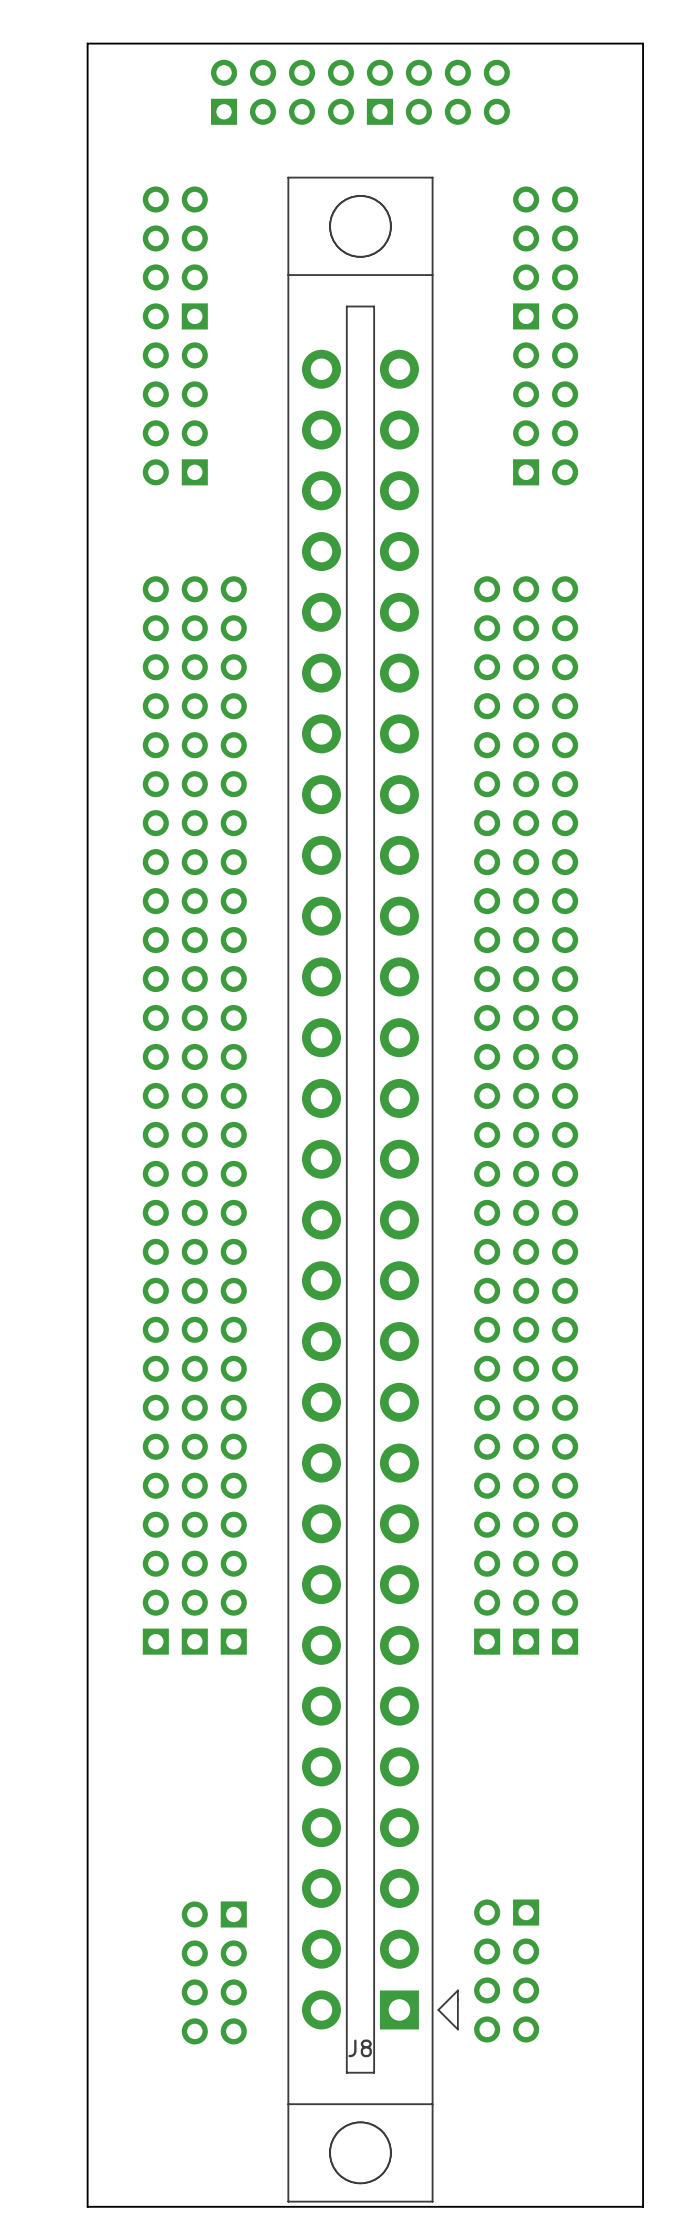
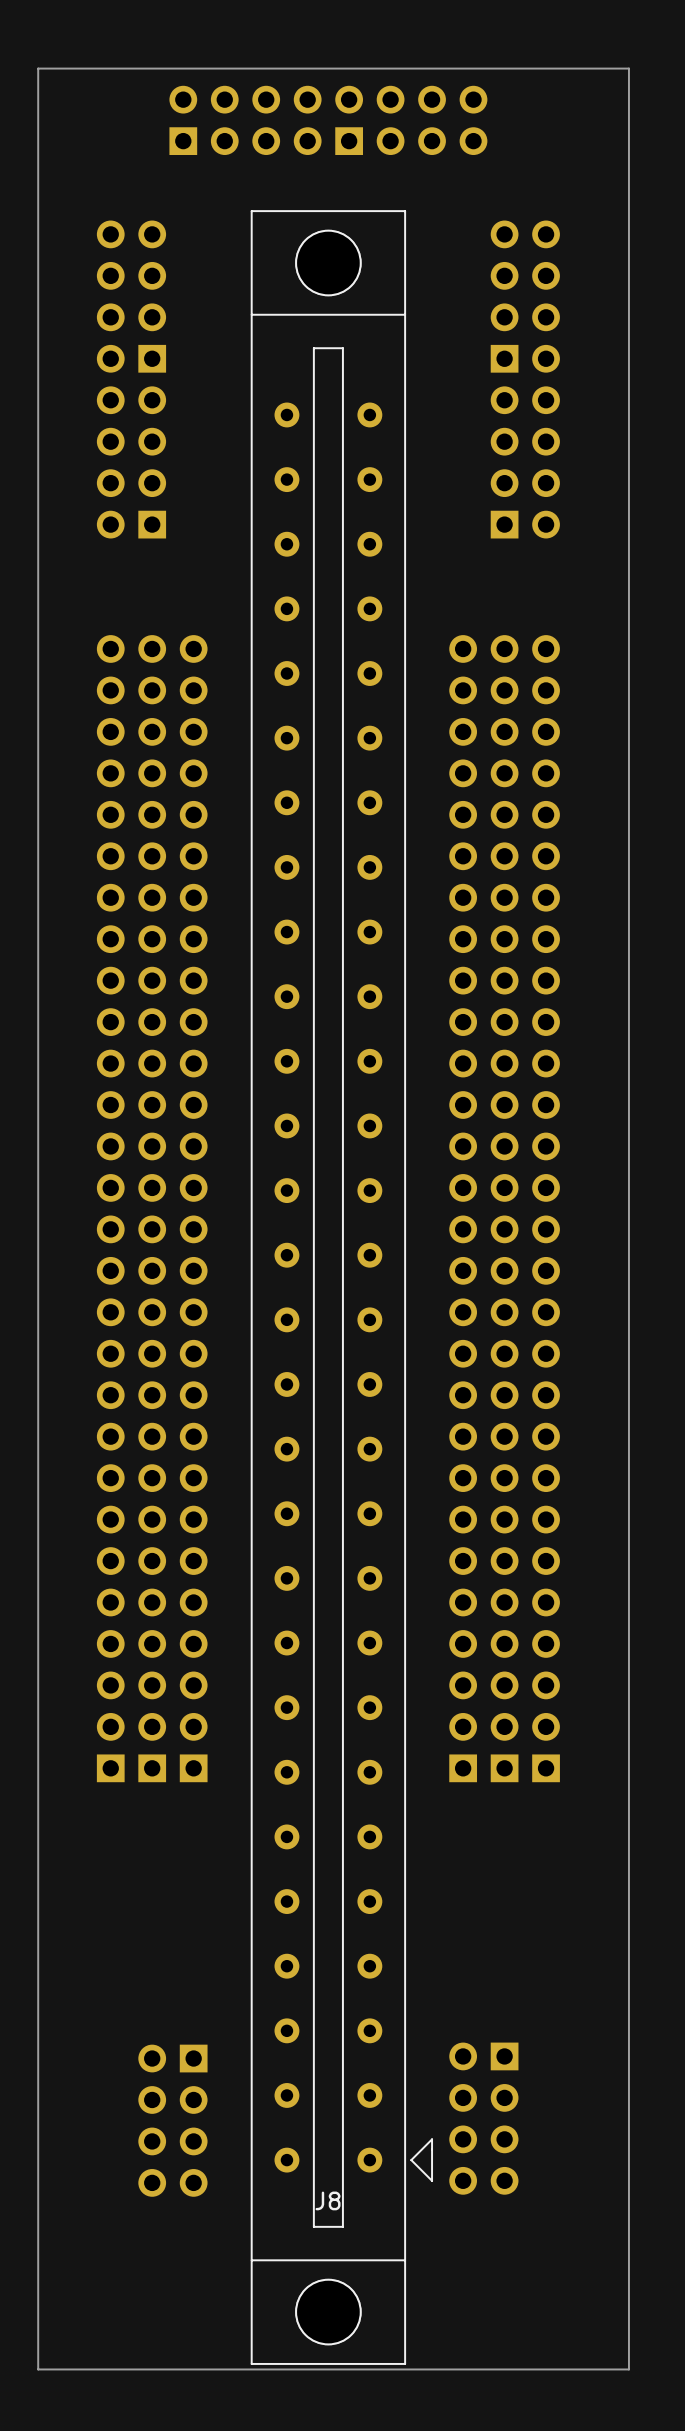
J8 footprint: [287, 176, 459, 2203] -> [250, 210, 434, 2365]

